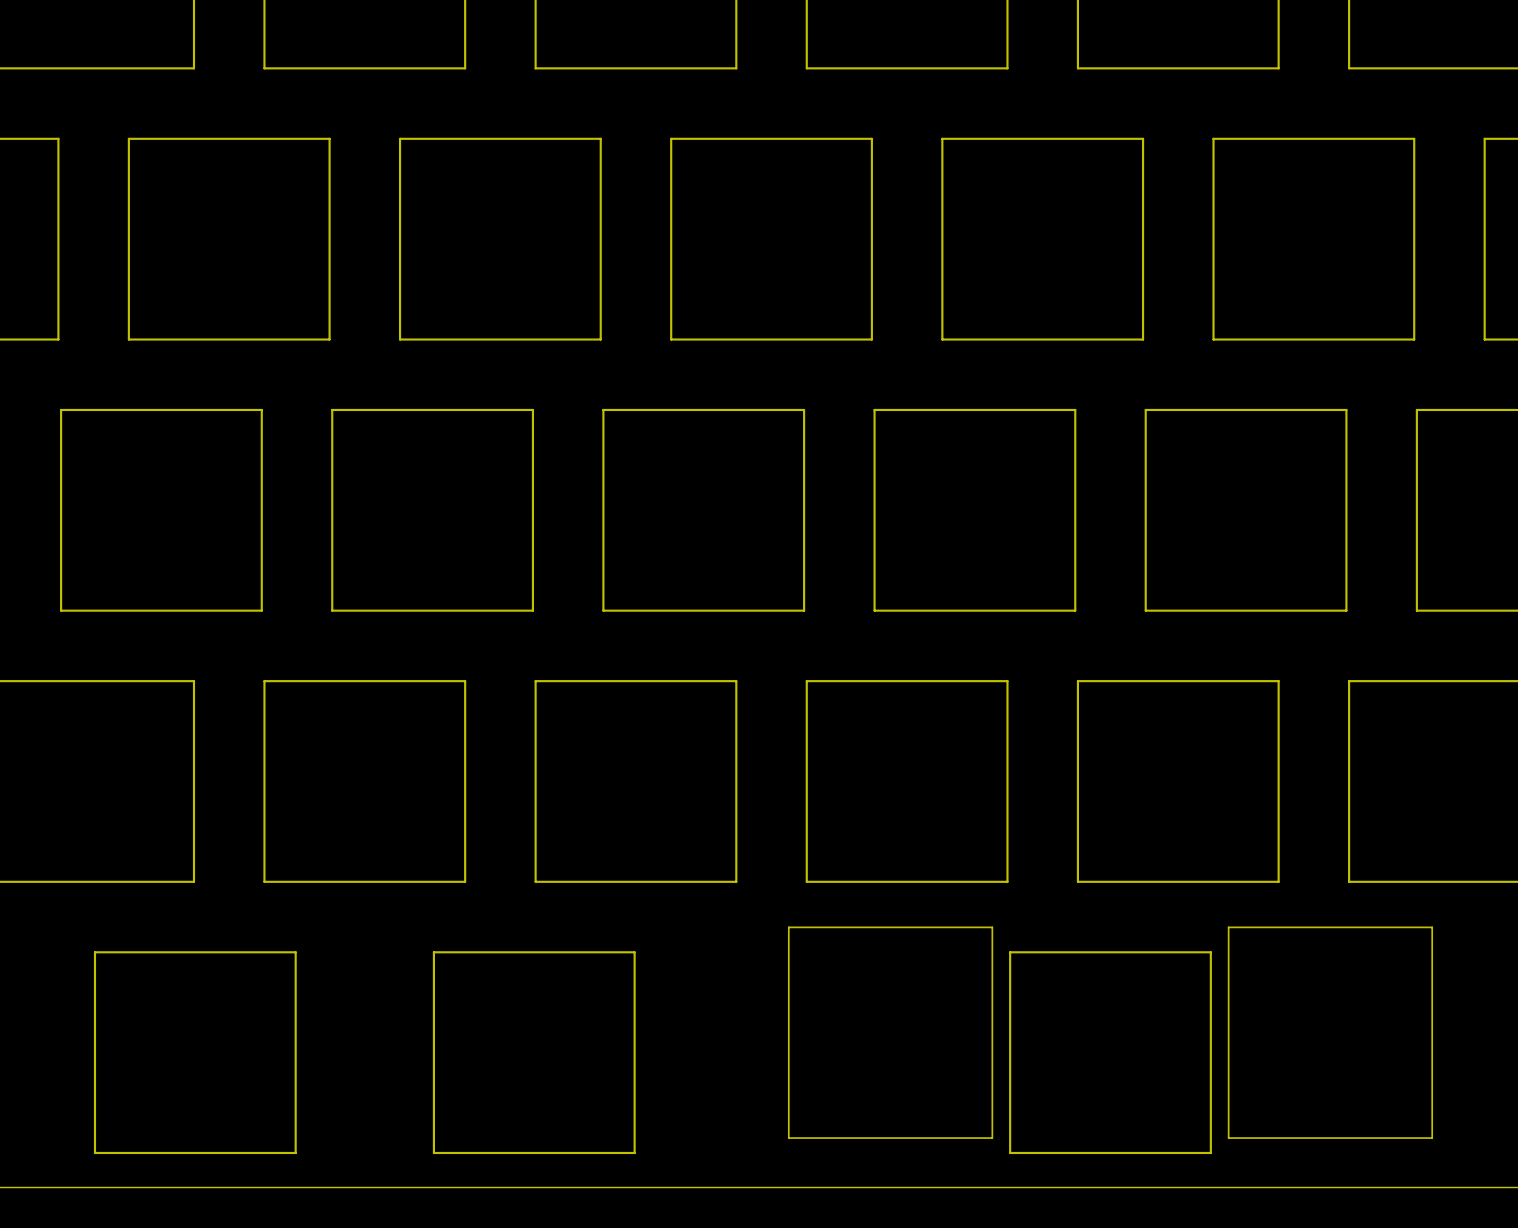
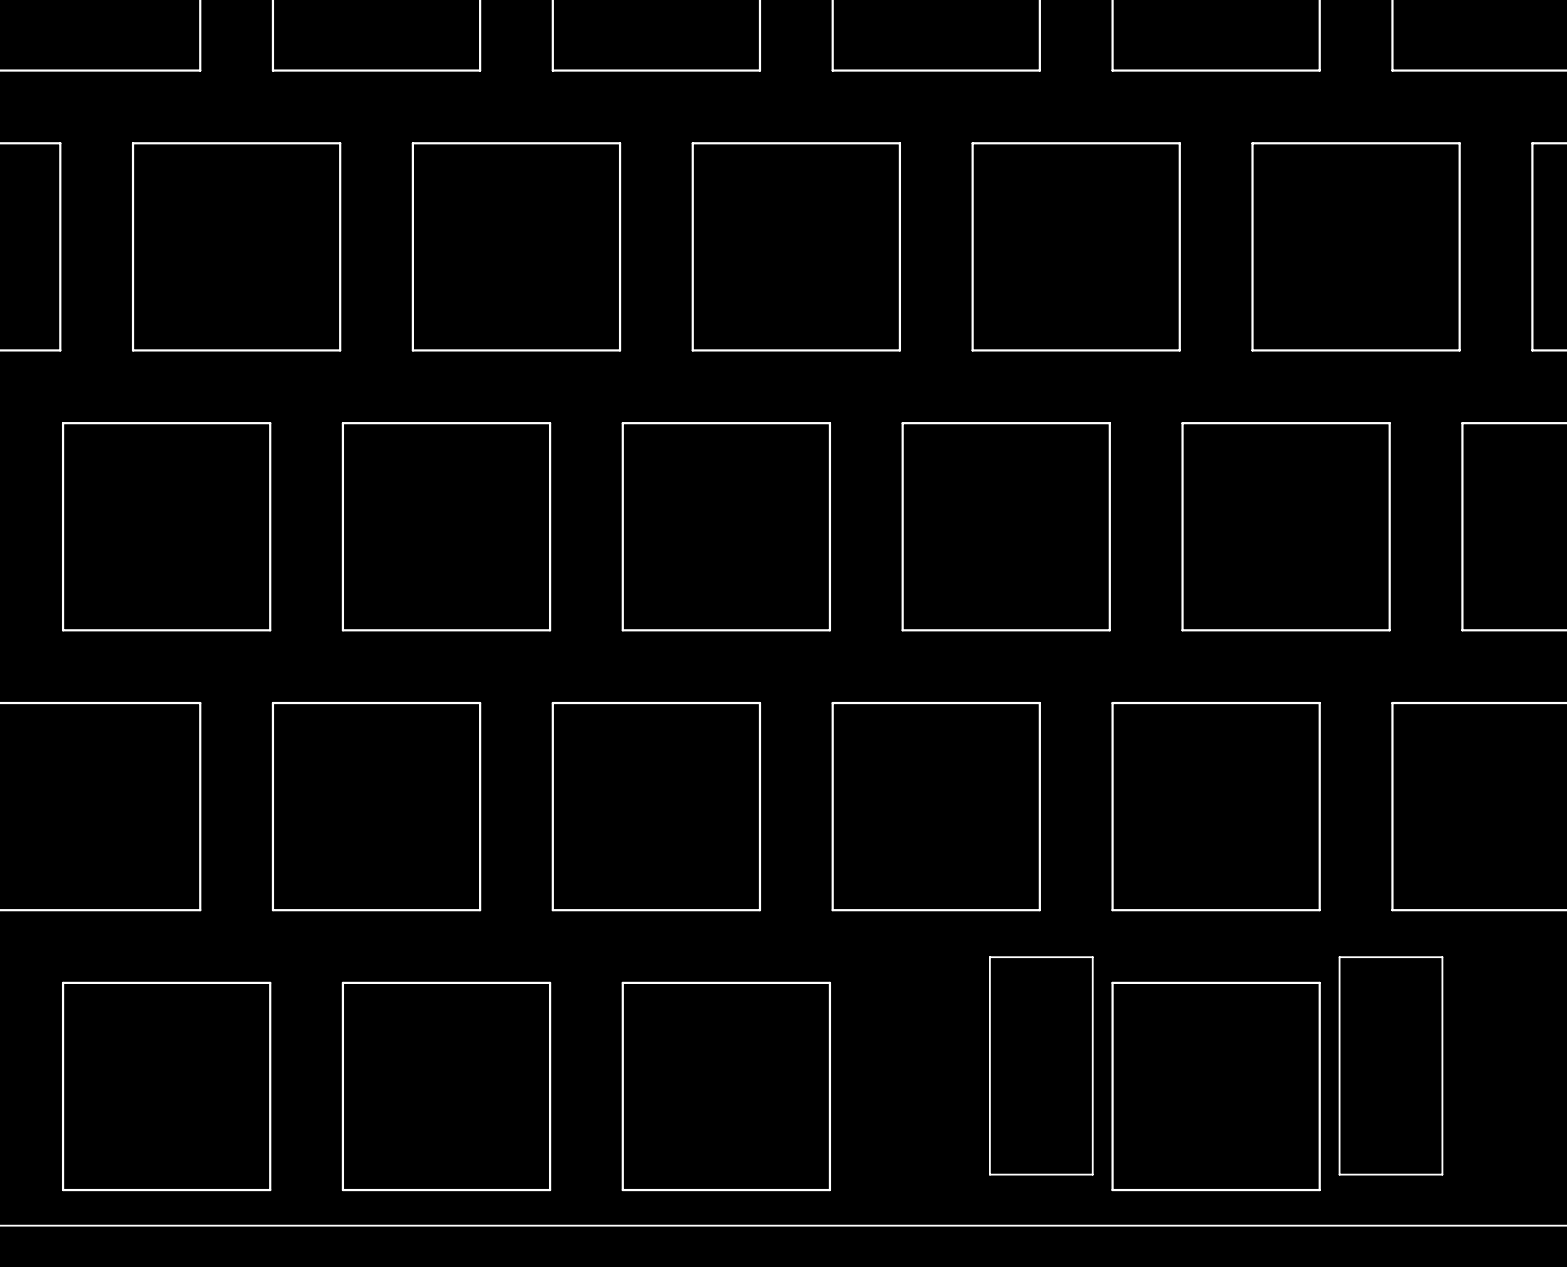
drawing: [787, 926, 1434, 1155] -> none
drawing: none -> [989, 956, 1444, 1192]
drawing: none -> [341, 981, 552, 1192]
drawing: [432, 951, 636, 1155] -> none
drawing: none -> [621, 981, 832, 1192]
drawing position: (195, 1052) -> (166, 1086)

